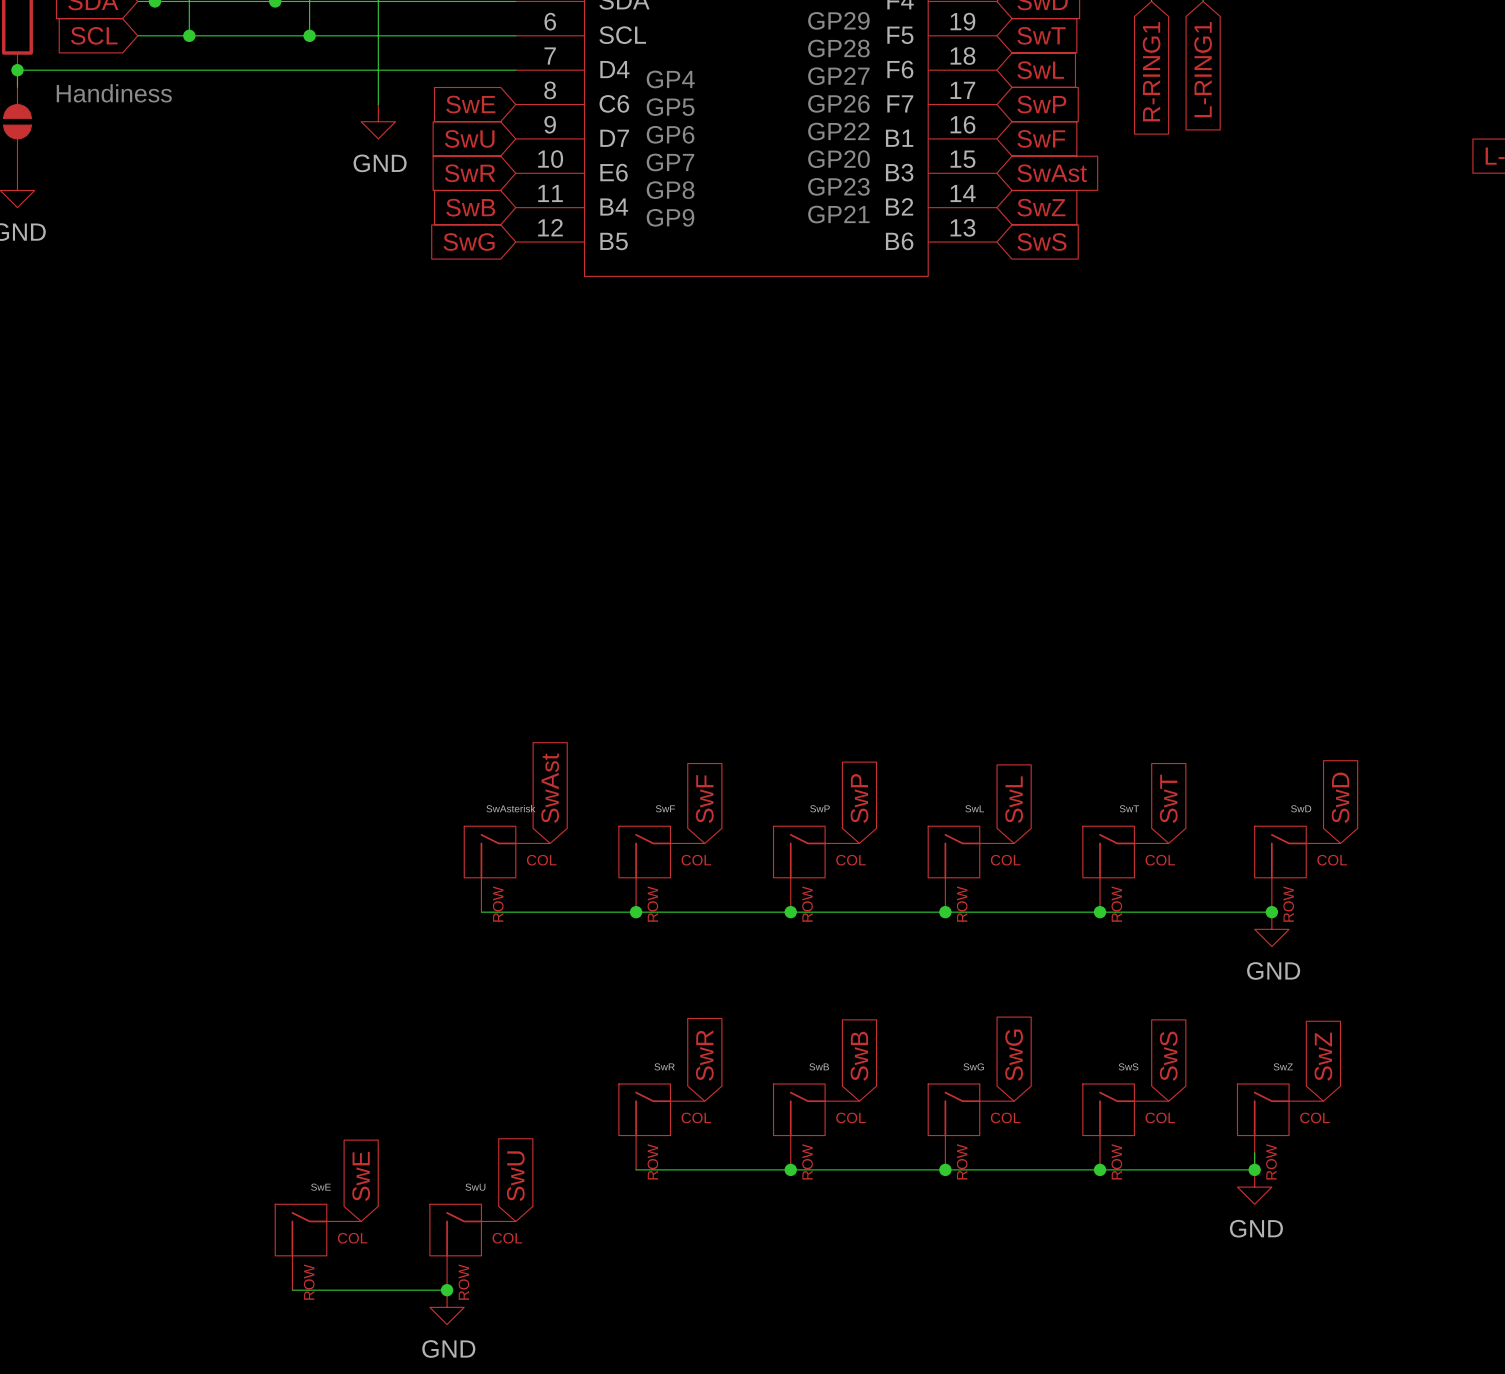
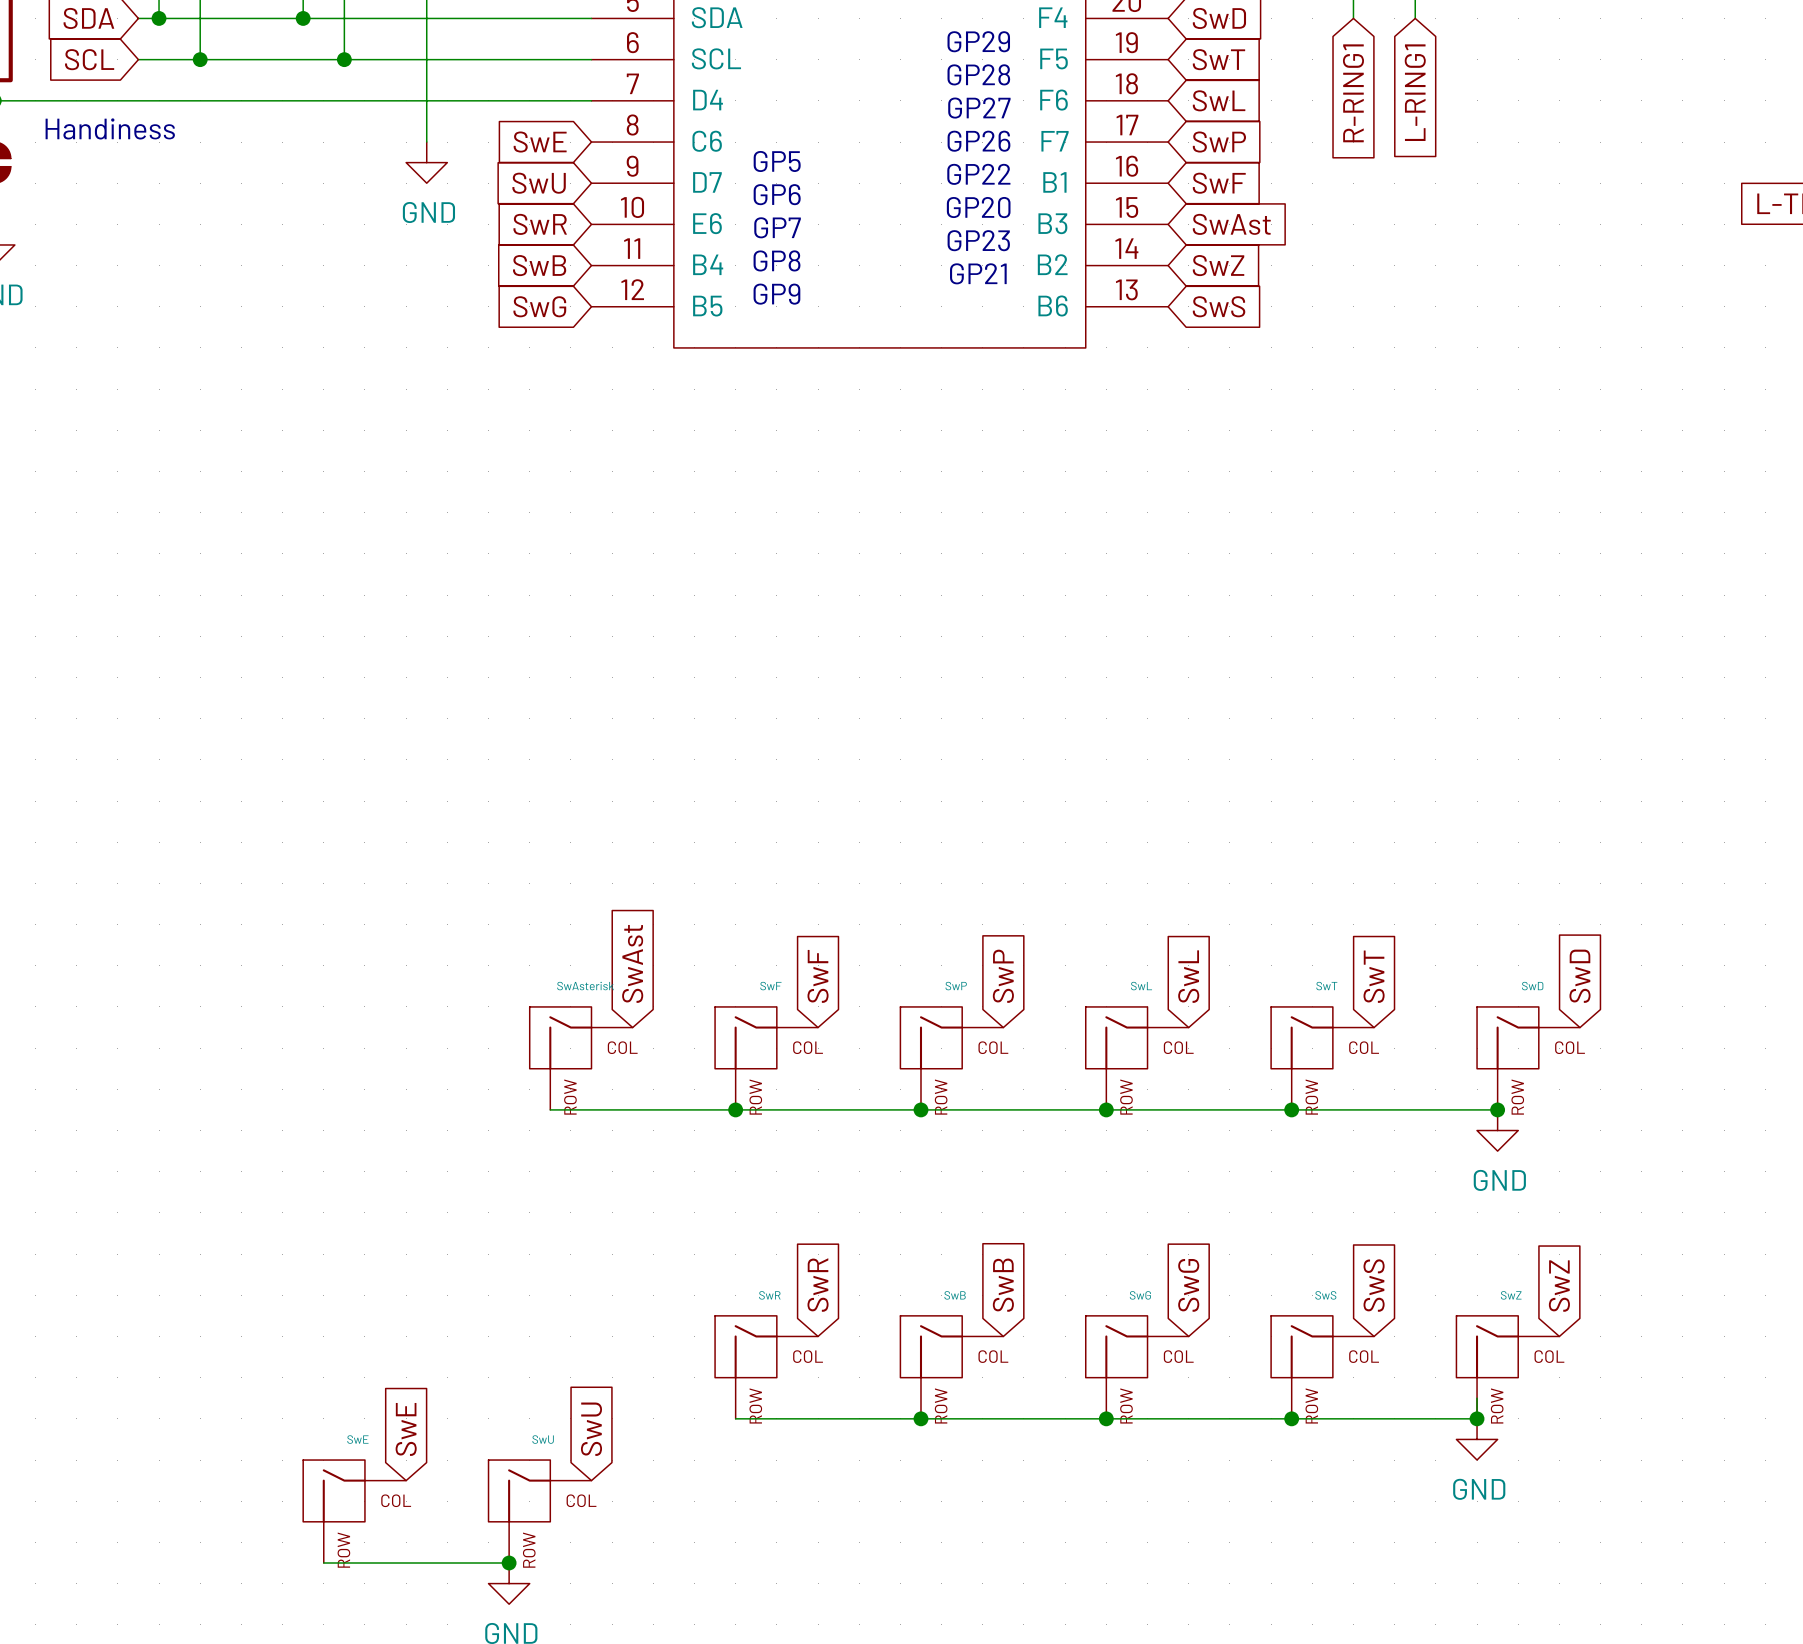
text: GP4 (670, 79) -> none
text position: GP5 (670, 107) -> GP5 (777, 161)
text position: GP6 (670, 134) -> GP6 (777, 194)
text position: GP7 (670, 162) -> GP7 (777, 227)
text position: GP8 (670, 190) -> GP8 (777, 260)
text position: GP9 (670, 217) -> GP9 (776, 294)

